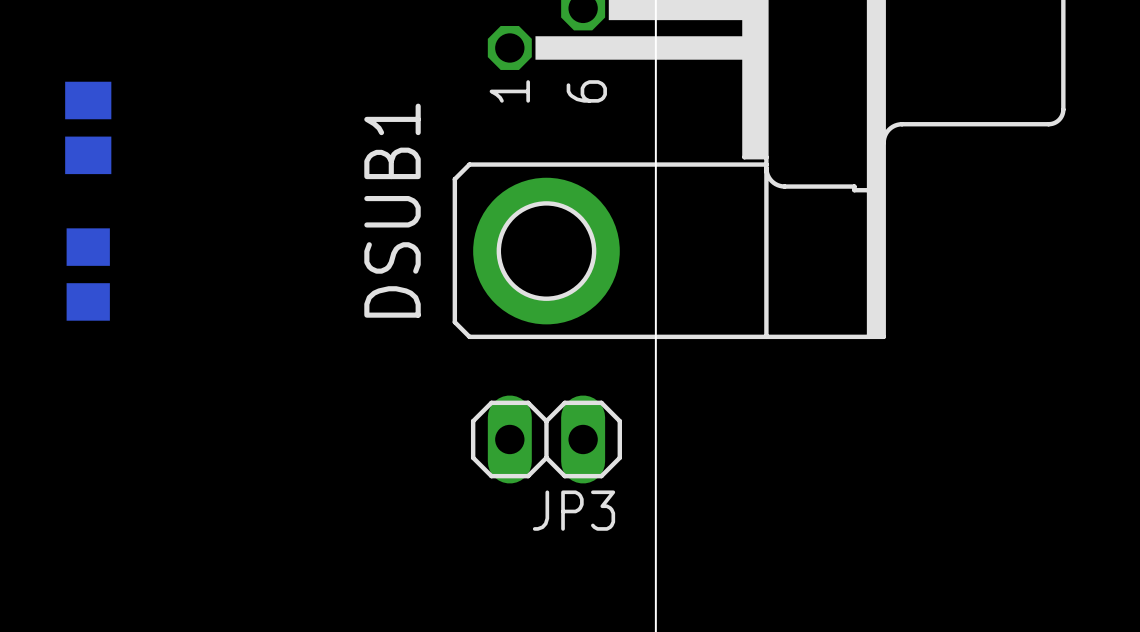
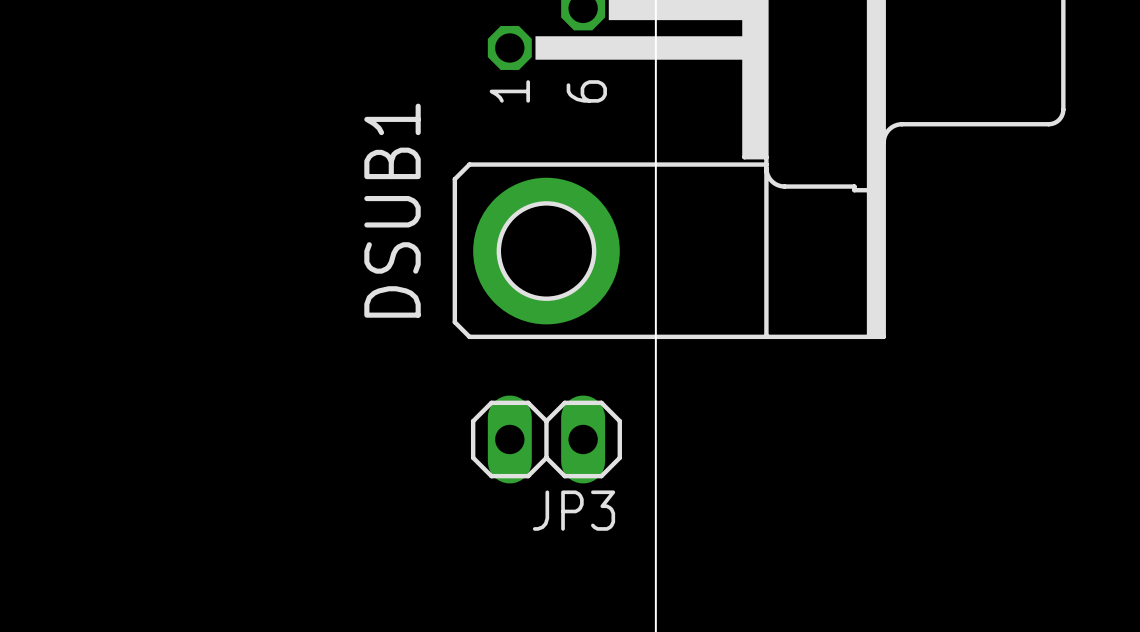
part: (88, 127) -> none
part: (88, 274) -> none

